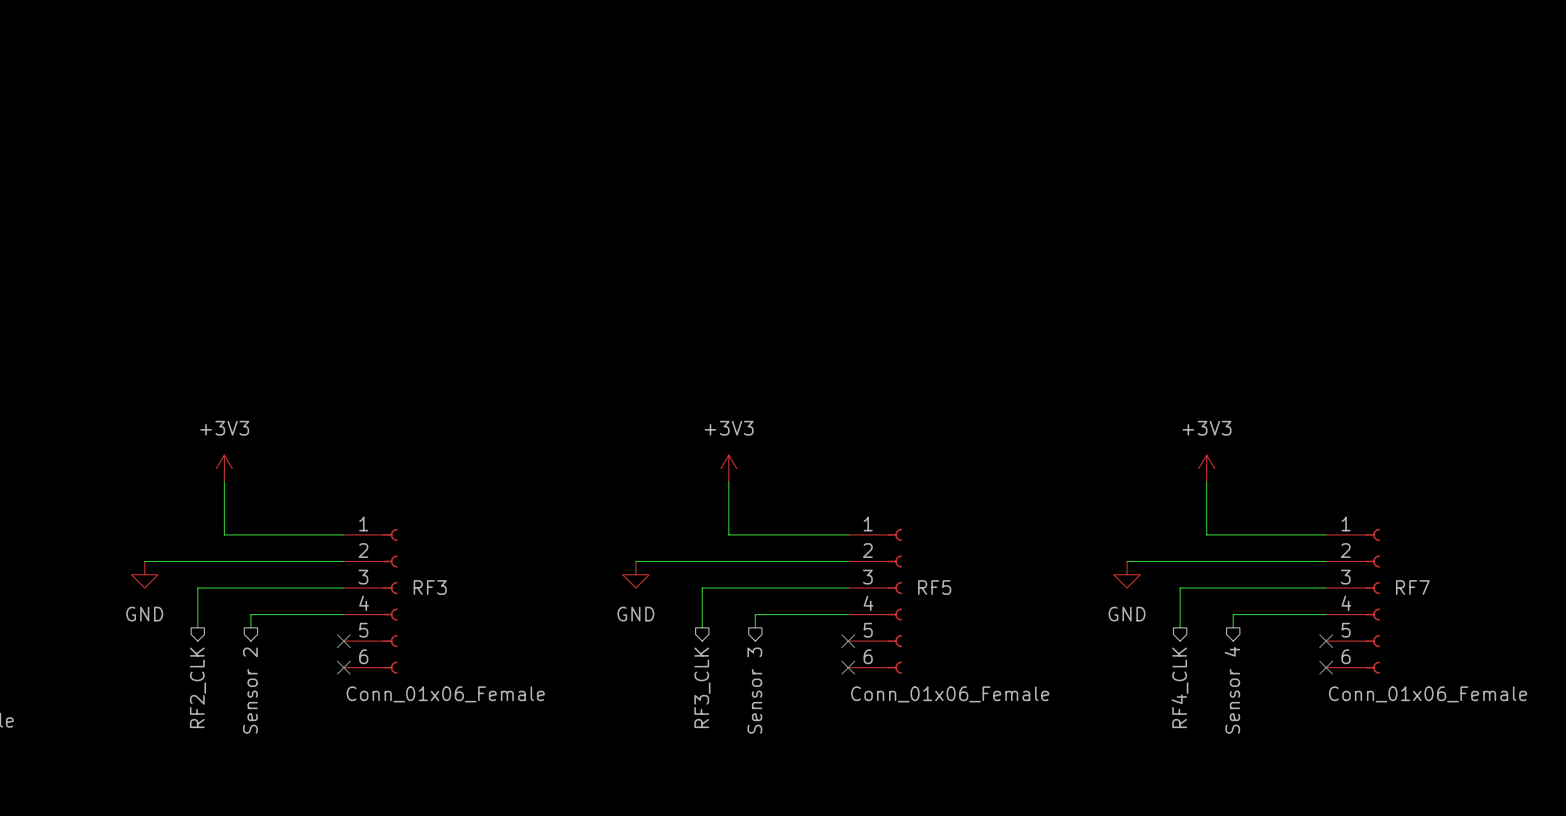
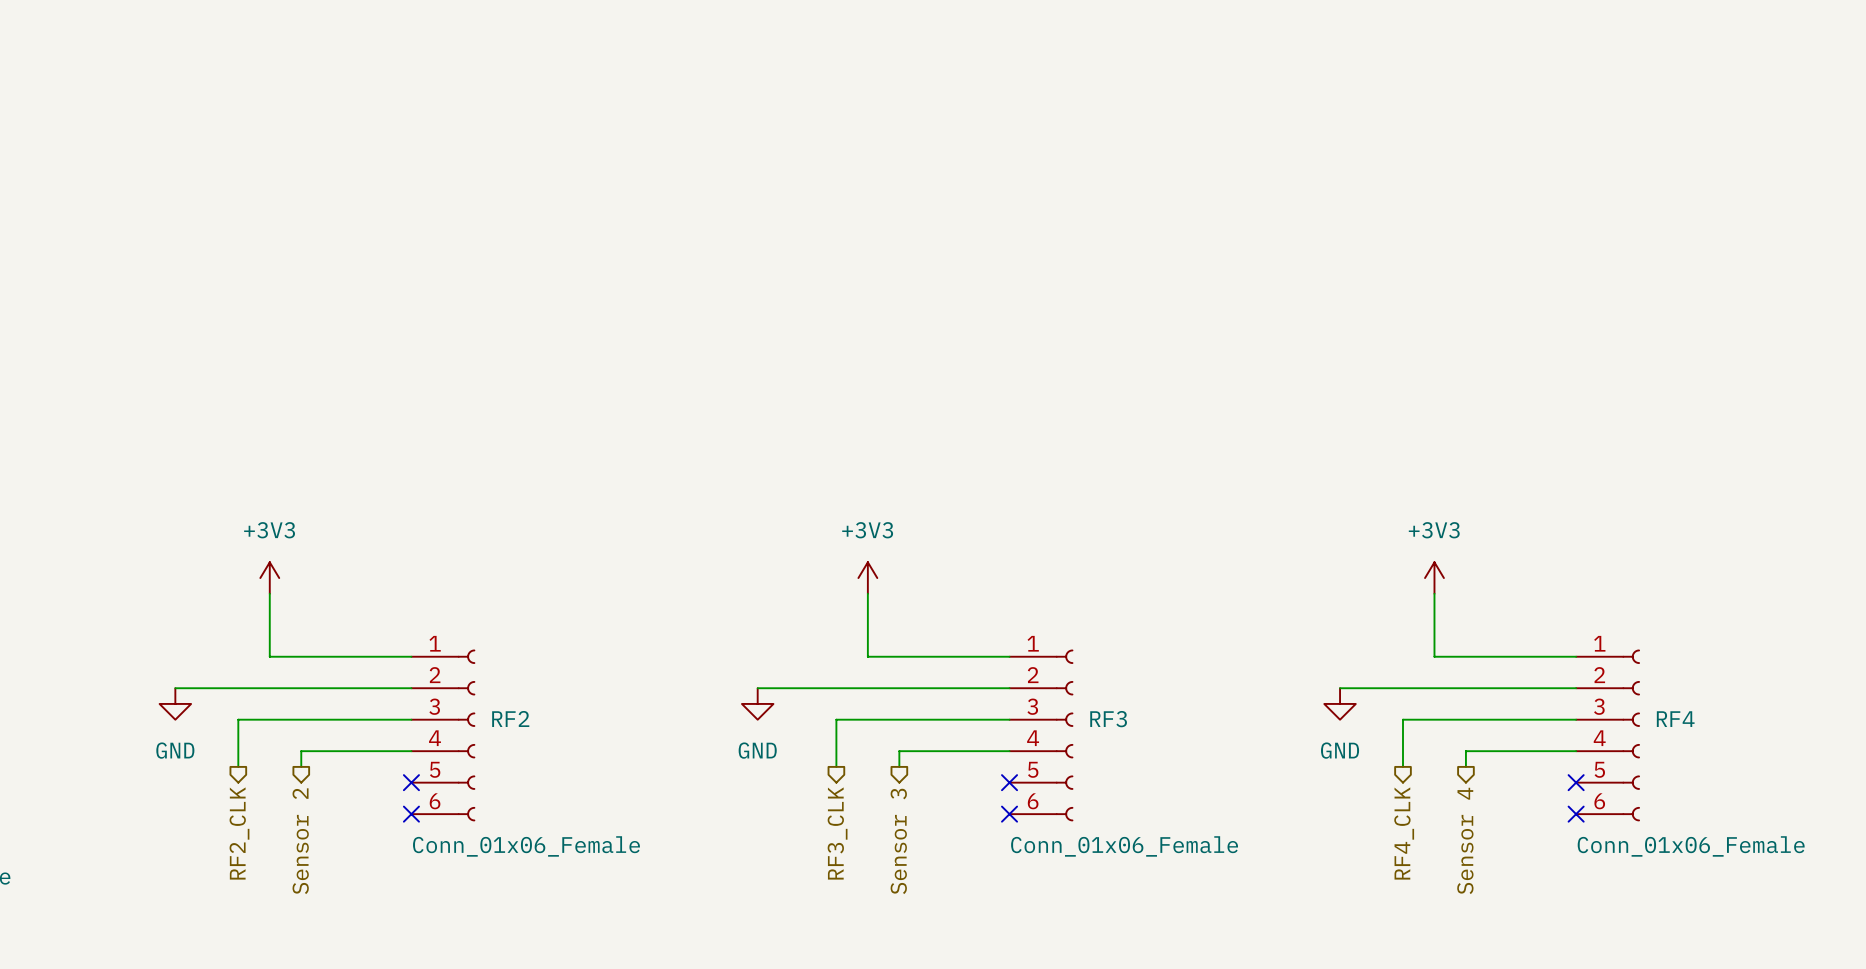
RF3 name: RF3 (430, 587) -> RF2 (510, 718)
RF5 name: RF5 (934, 587) -> RF3 (1108, 719)
RF7 name: RF7 (1412, 587) -> RF4 (1675, 719)

